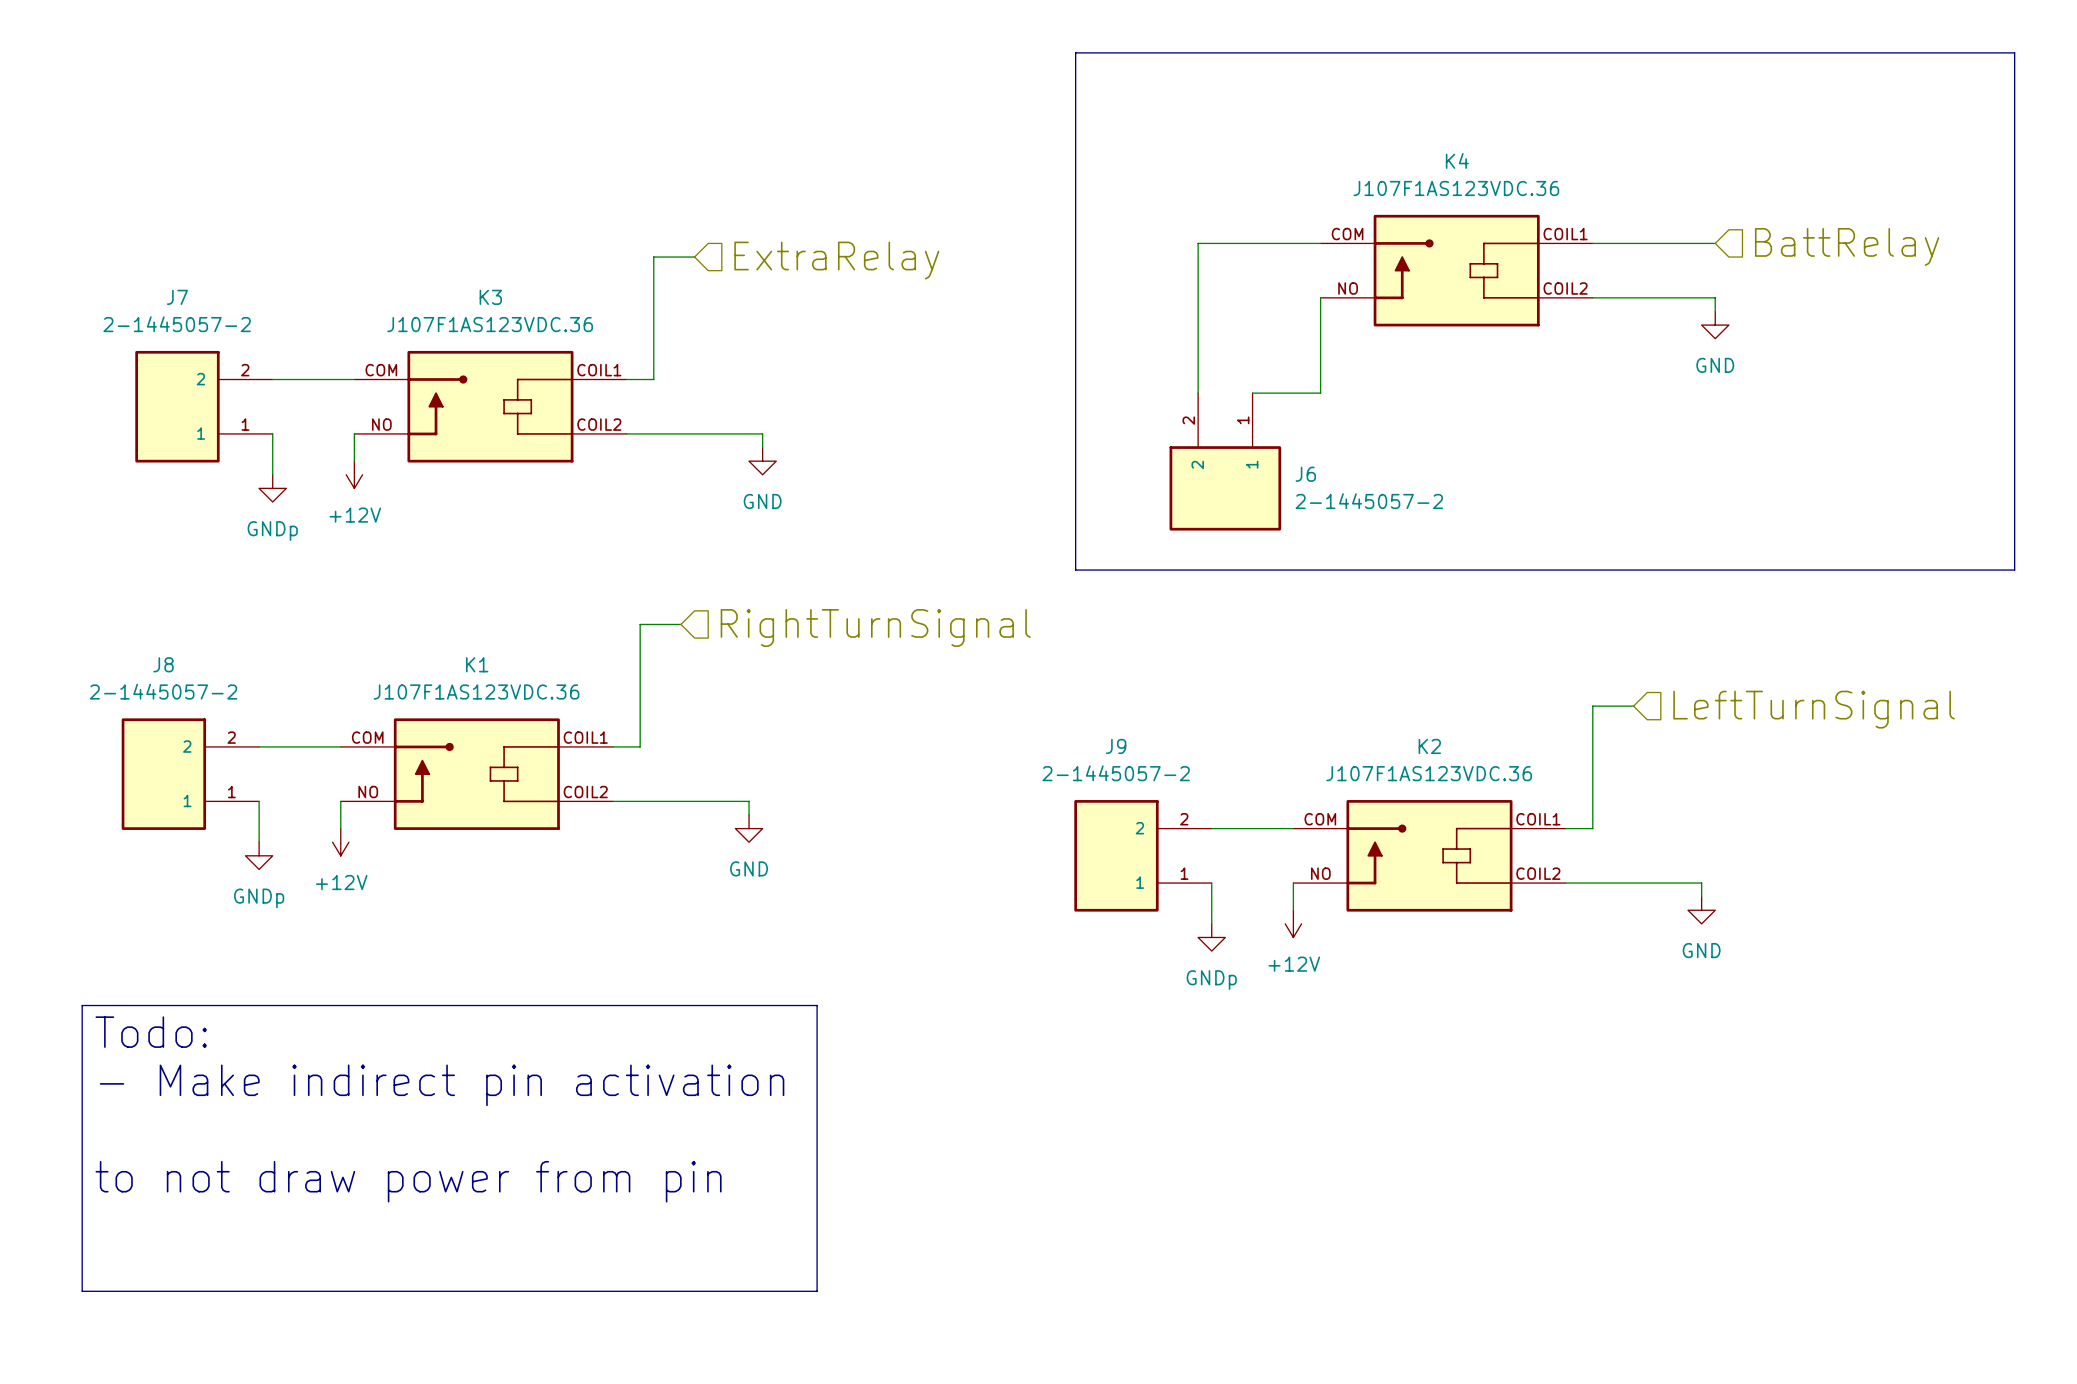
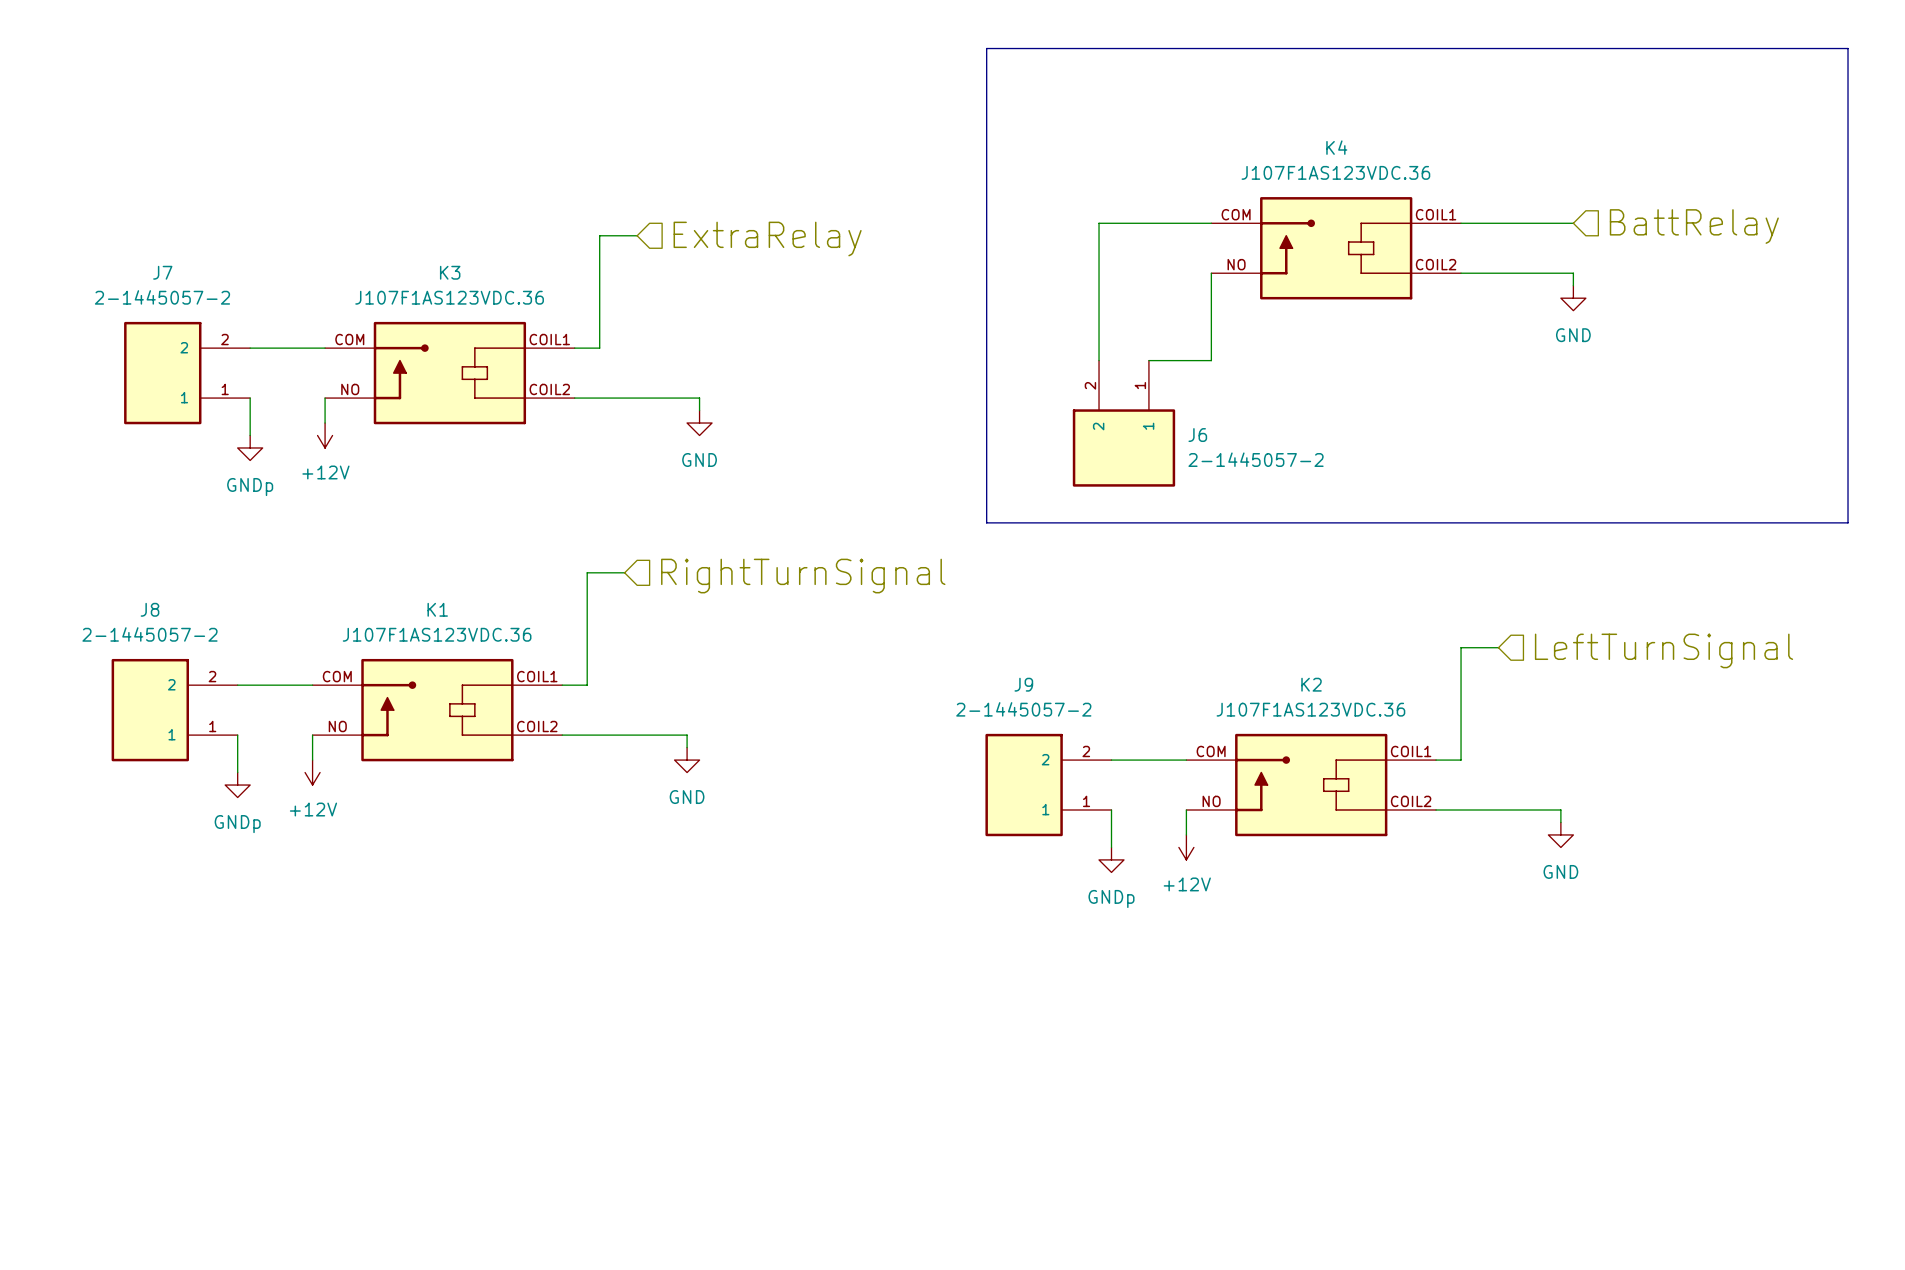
line: (82, 1005) (817, 1005) (817, 1291) (82, 1291) (82, 1005) -> none
text: Todo: (151, 1032) -> none
text: - Make indirect pin activation (442, 1085) -> none
text: to not draw power from pin (408, 1181) -> none

